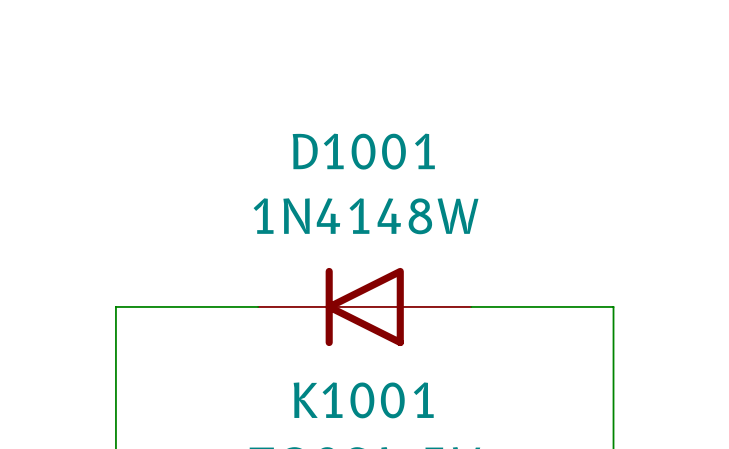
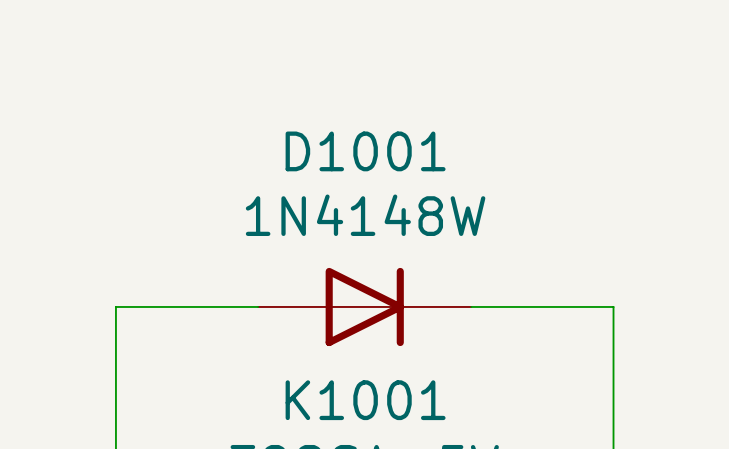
D1001 rotation: 0° (364, 306) -> 180° (364, 306)

